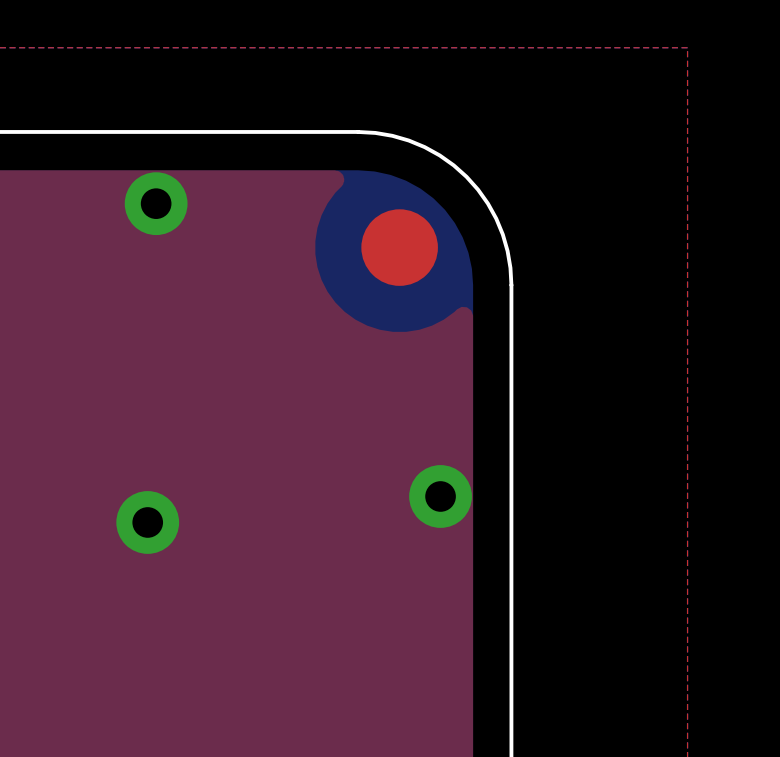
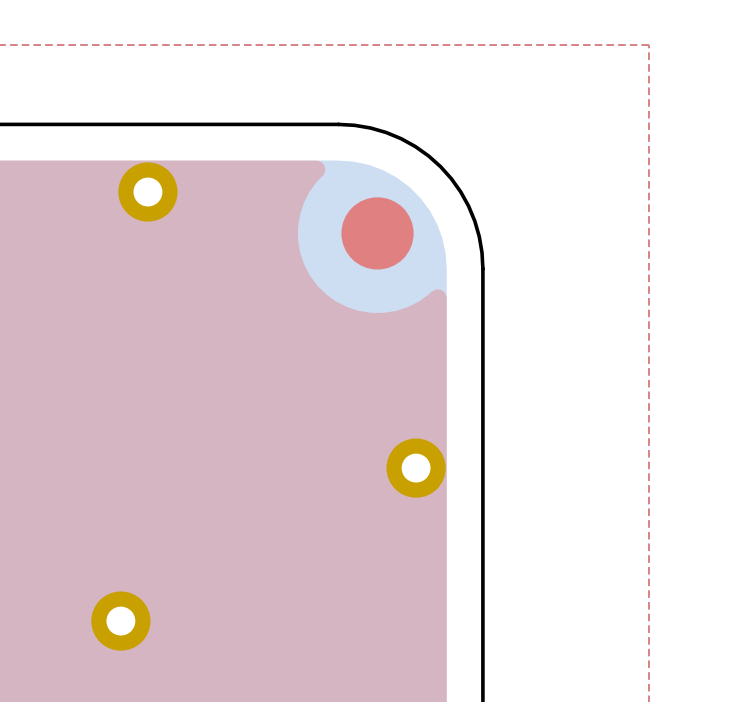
part: (147, 522) -> none
part: none -> (120, 621)

